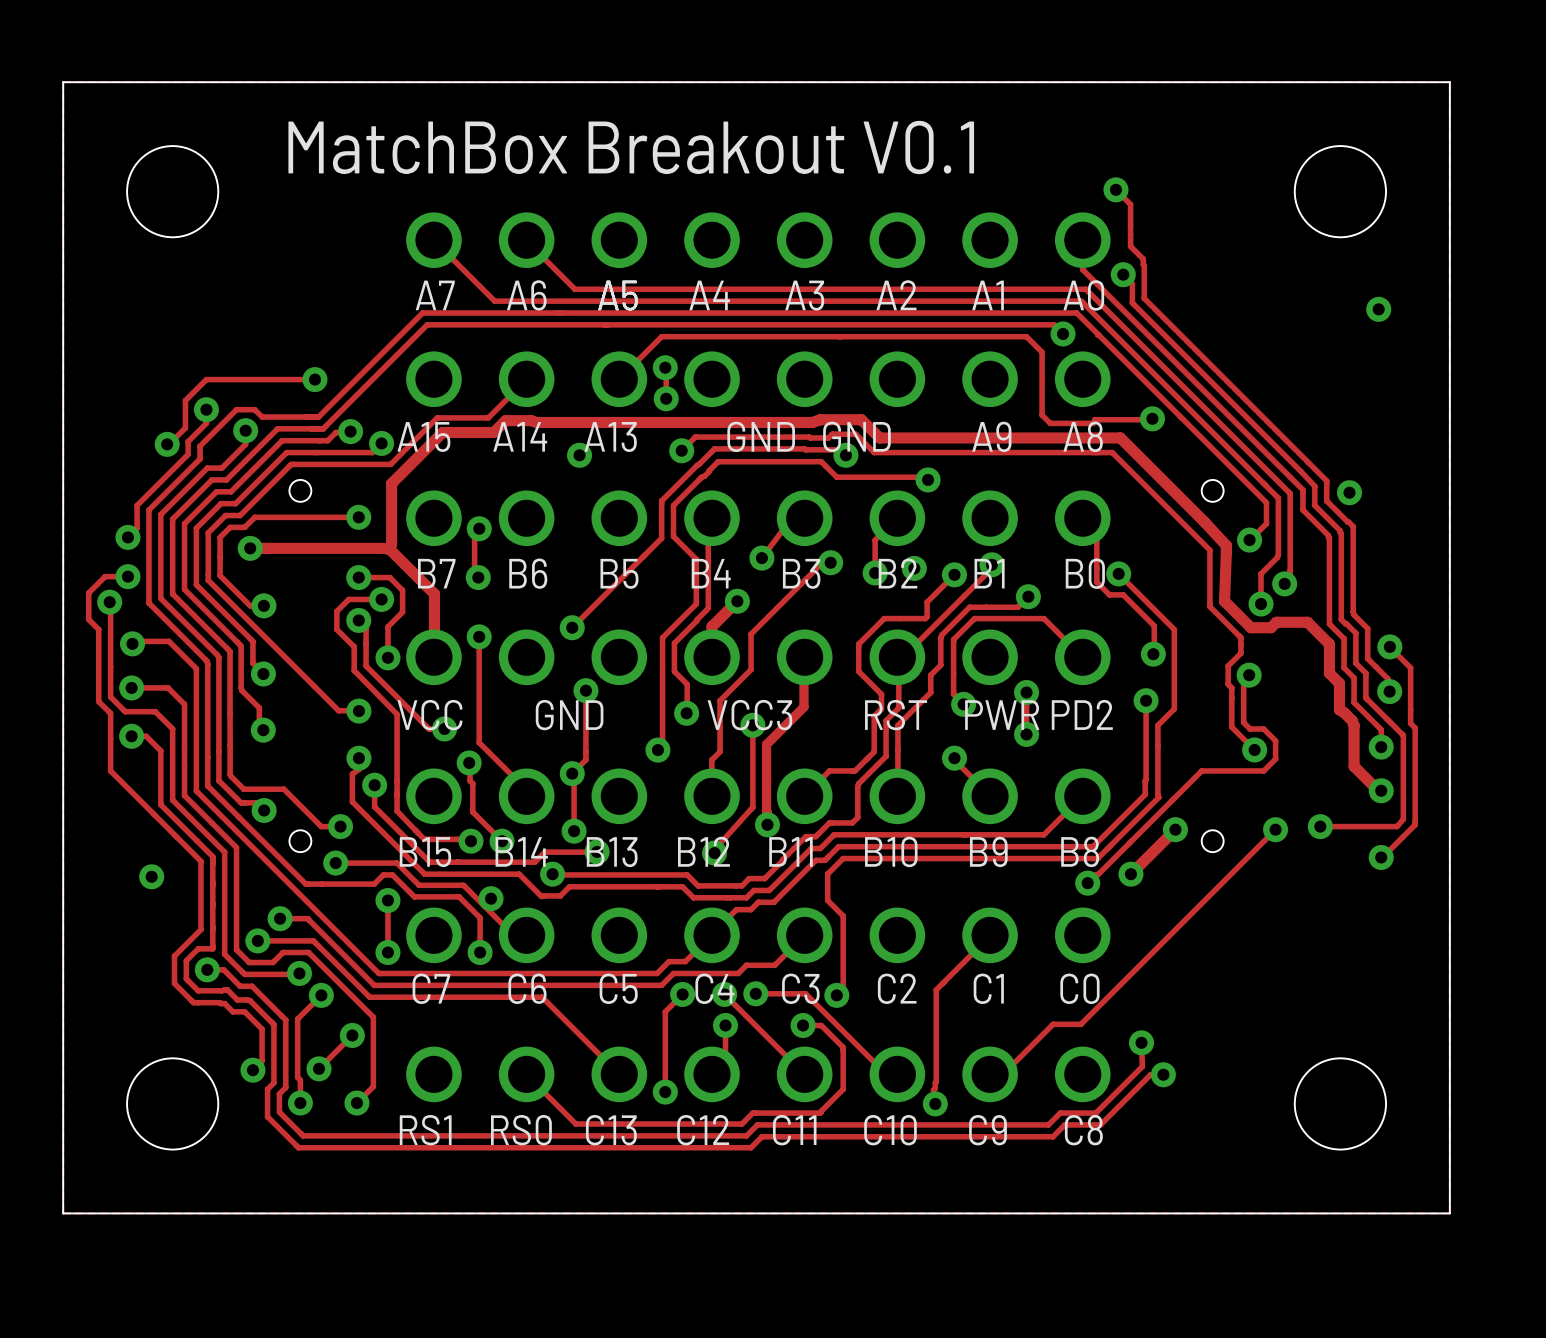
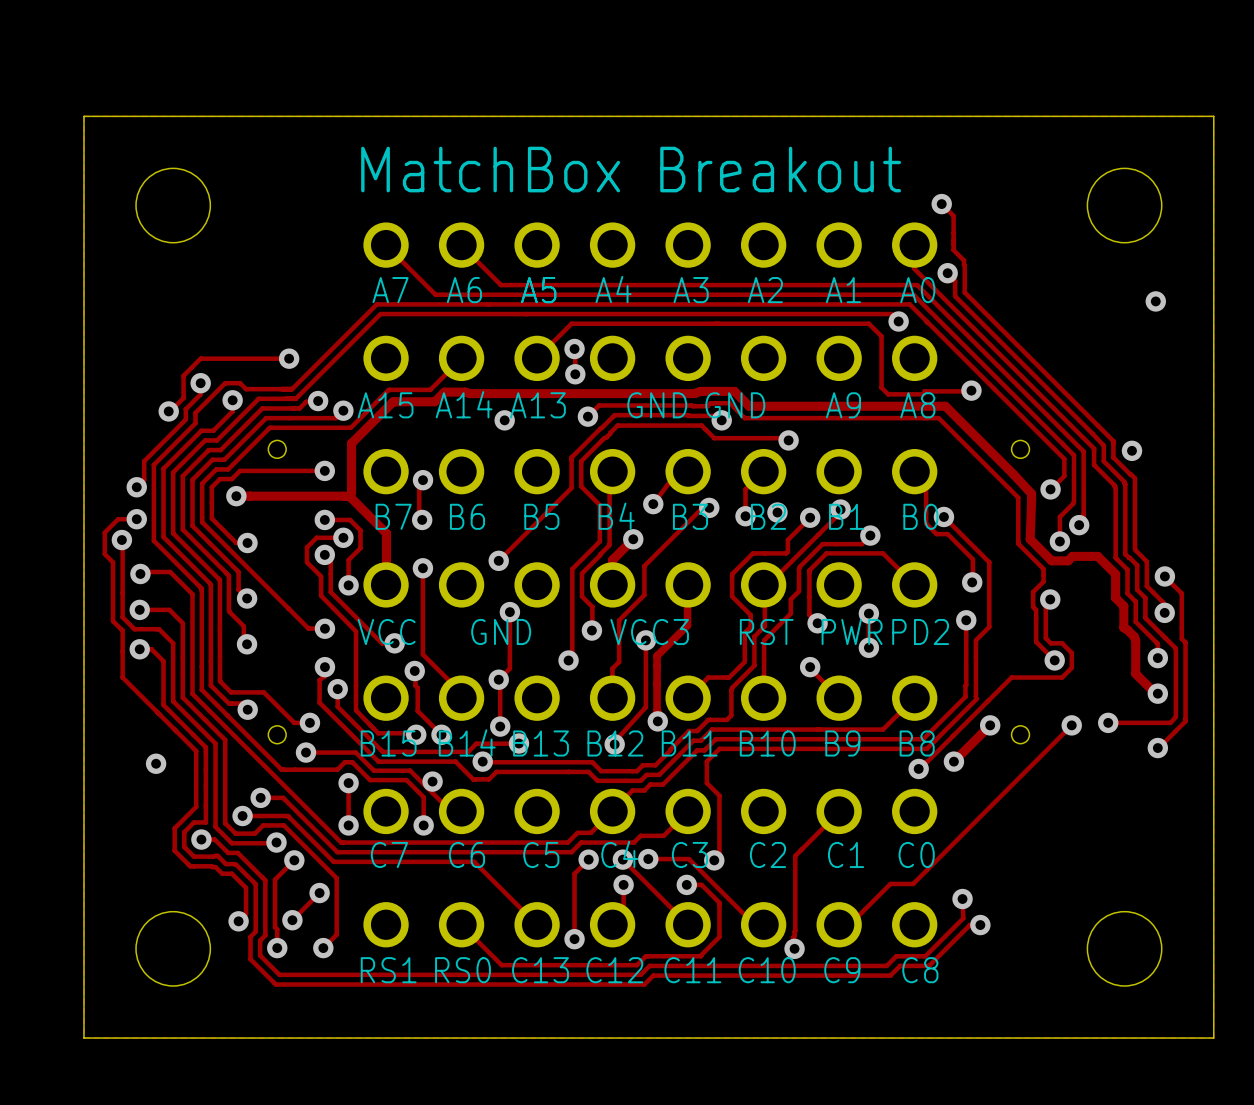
text: MatchBox Breakout V0.1 (631, 147) -> MatchBox Breakout (631, 169)

